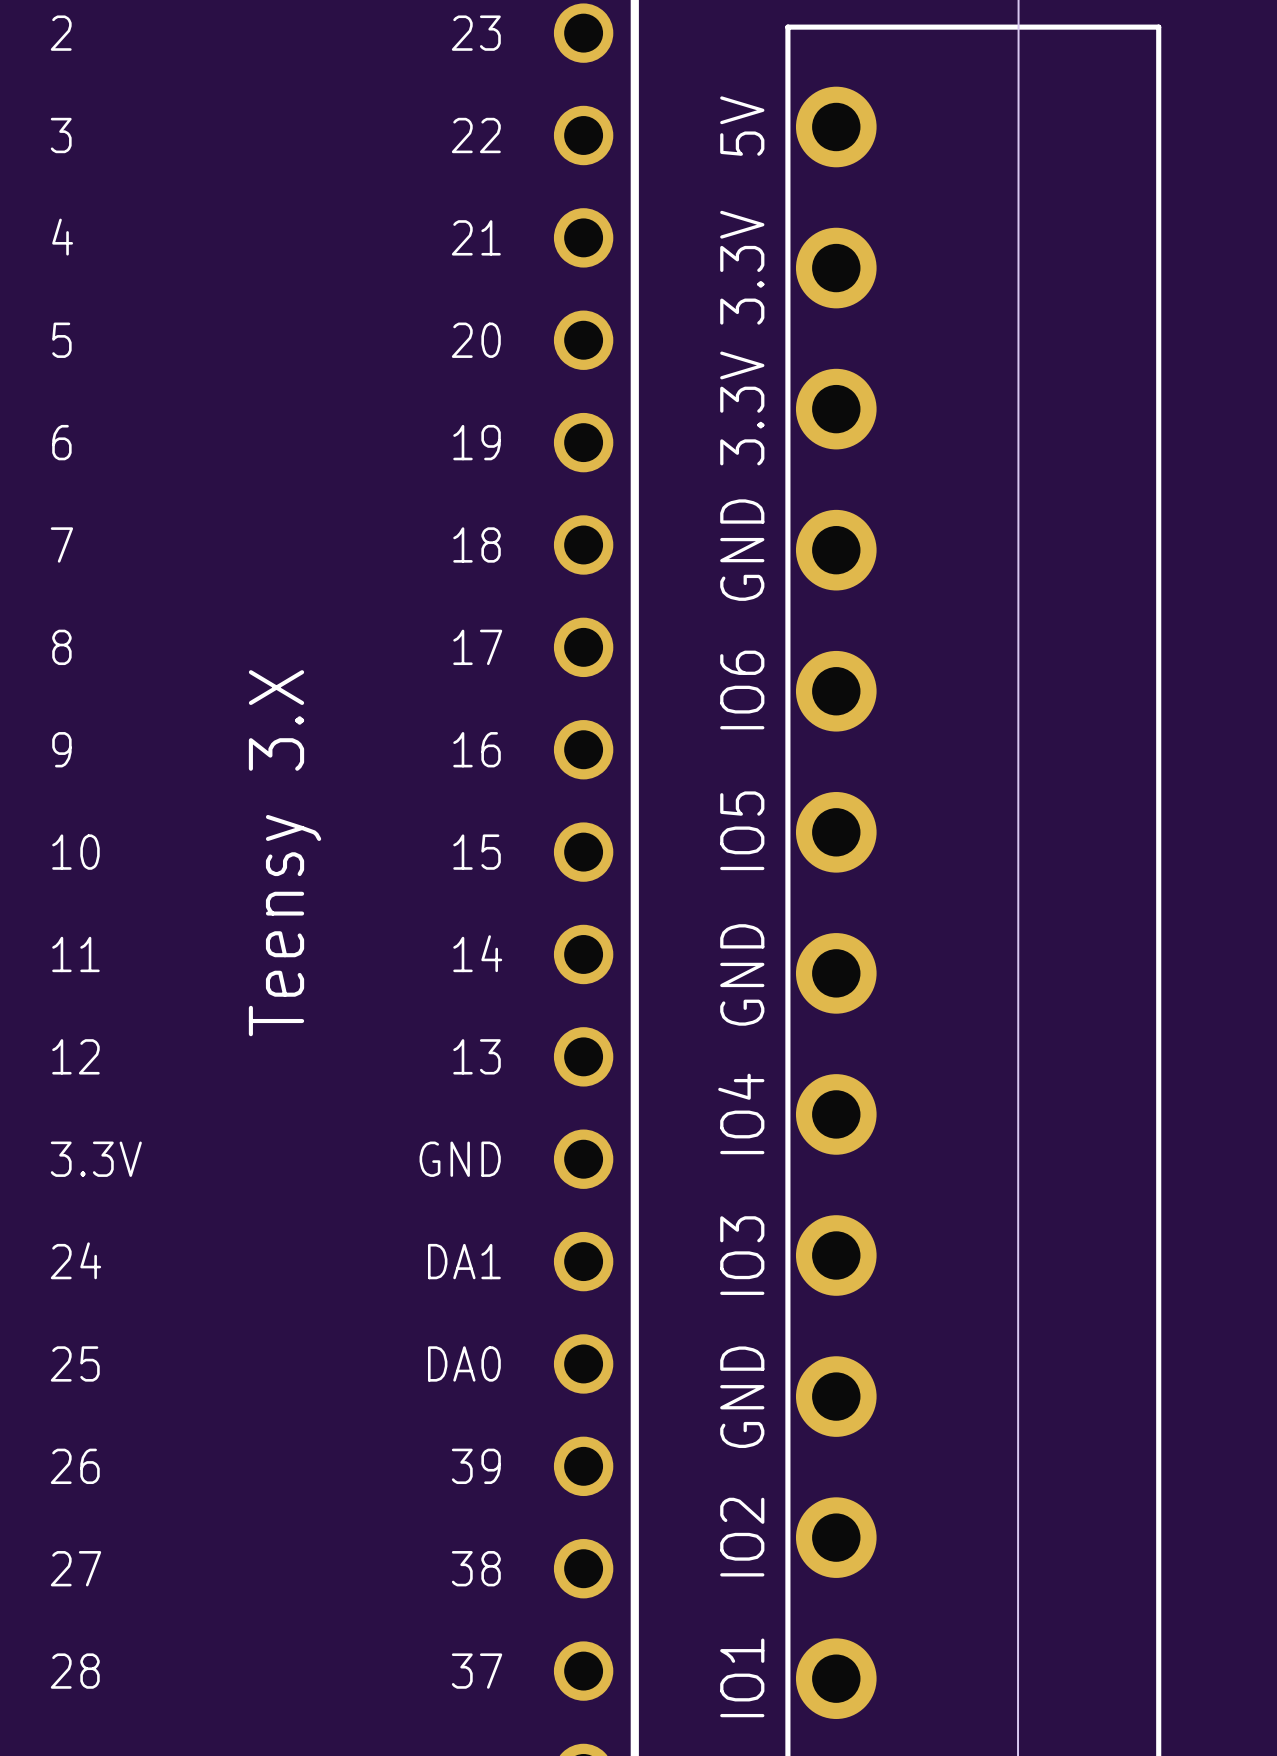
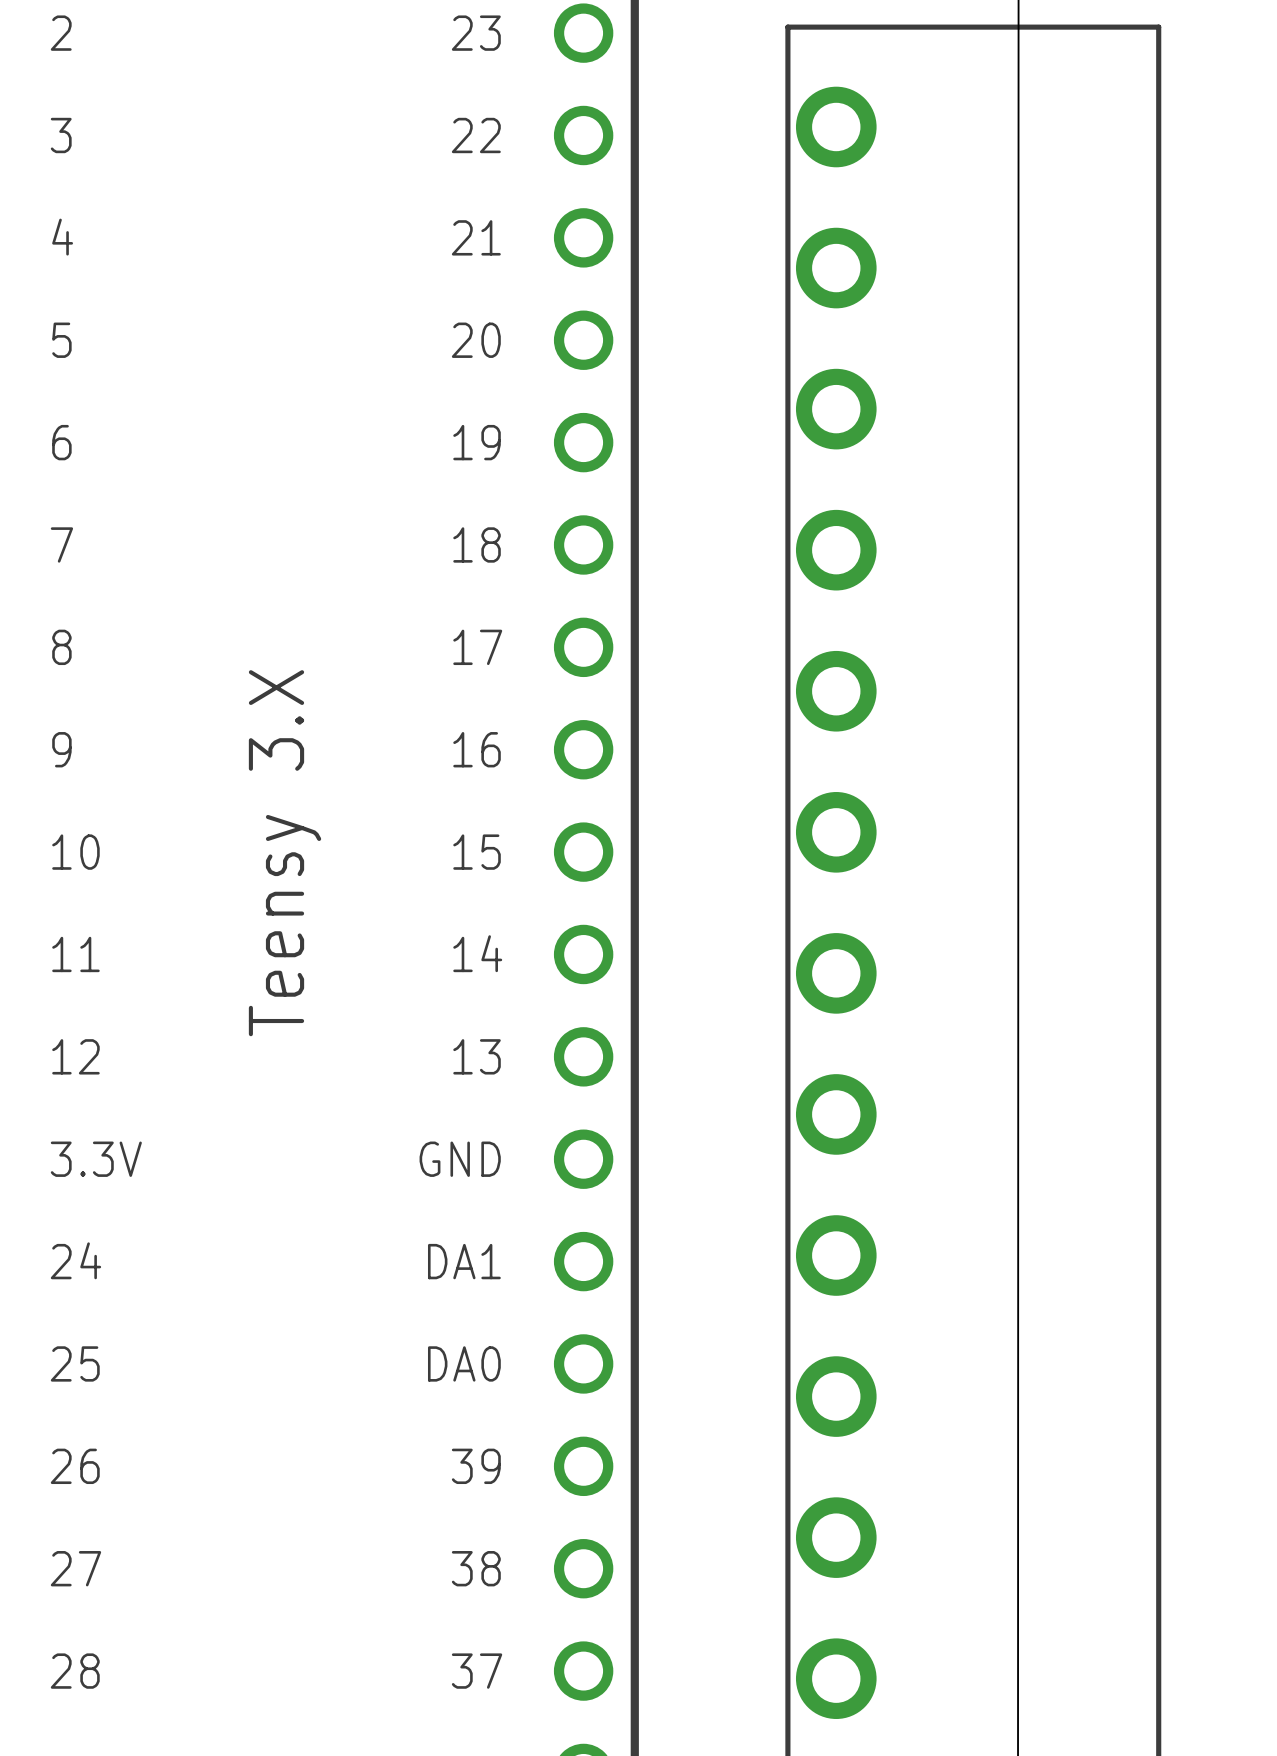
text: 5V (742, 126) -> none
text: 3.3V (742, 267) -> none
text: 3.3V (742, 408) -> none
text: GND (742, 550) -> none
text: IO6 (742, 689) -> none
text: IO5 (742, 830) -> none
text: GND (742, 974) -> none
text: IO4 (741, 1113) -> none
text: IO3 (742, 1255) -> none
text: GND (742, 1397) -> none
text: IO2 (742, 1537) -> none
text: IO1 (742, 1677) -> none

